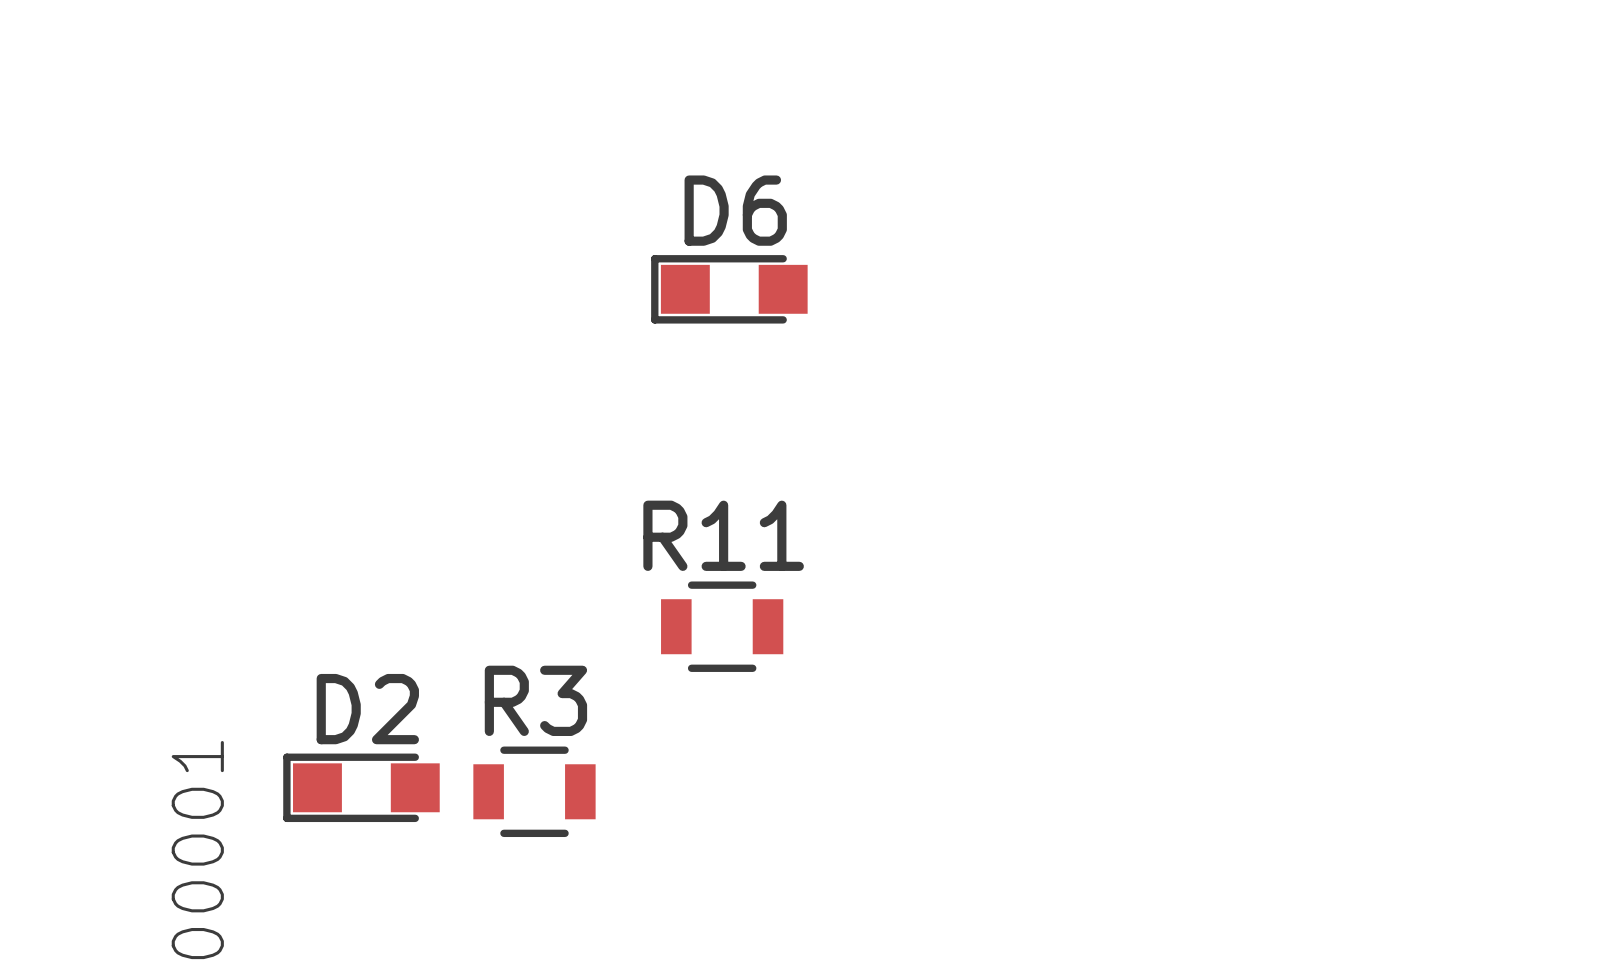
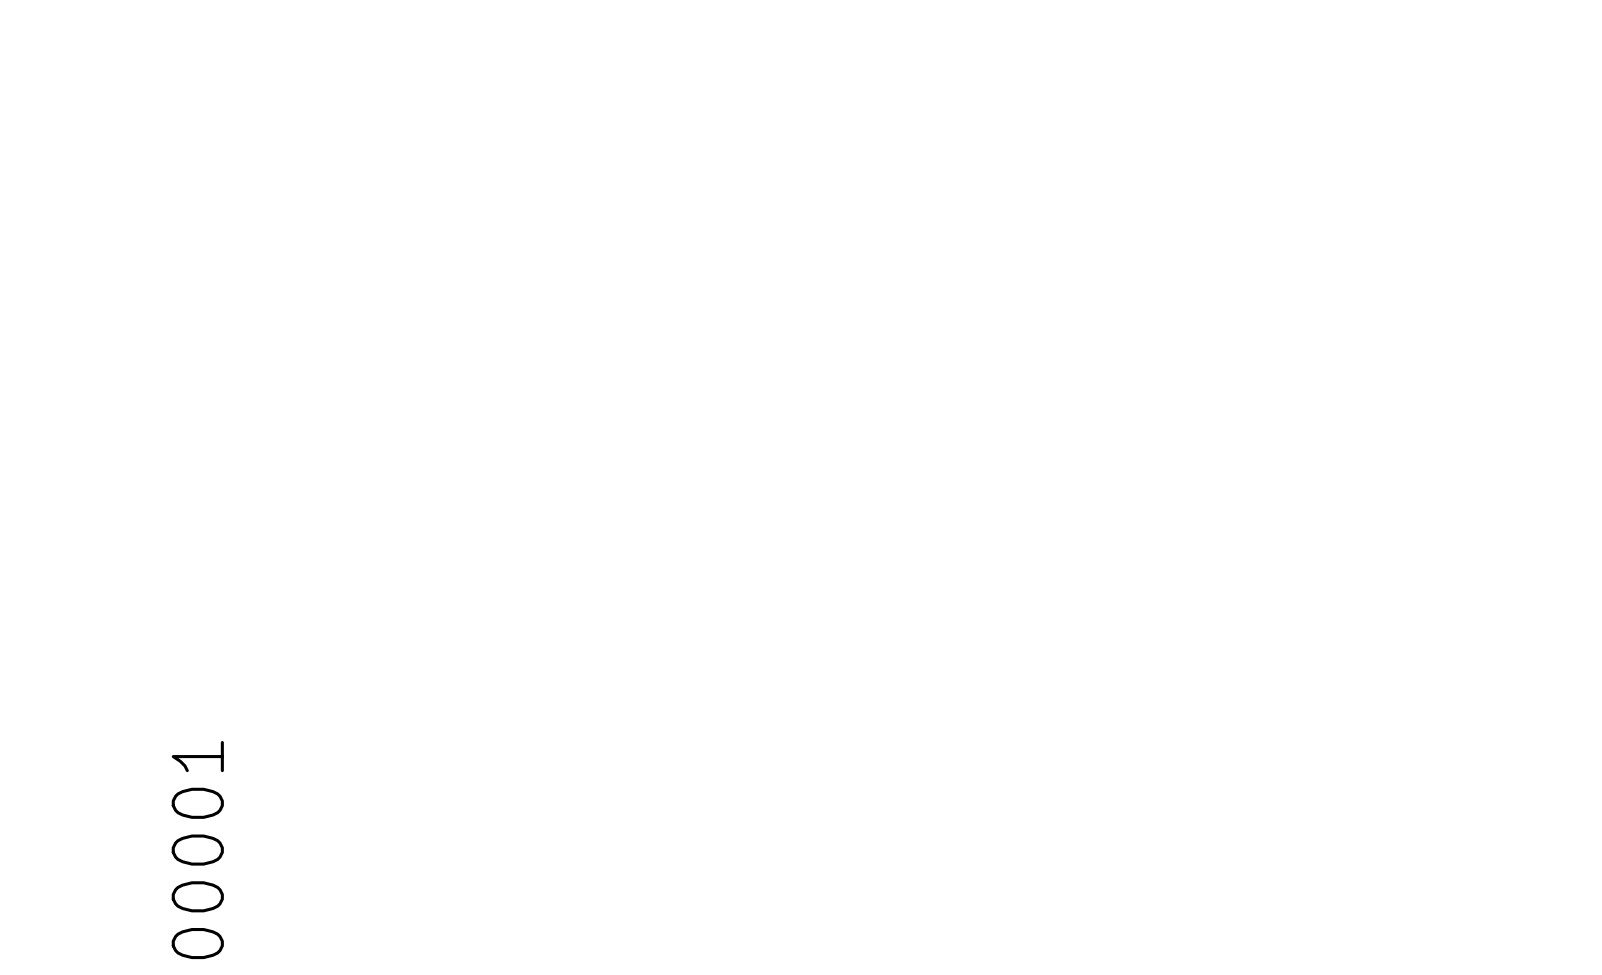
D6: (729, 289) -> none
R11: (722, 626) -> none
D2: (361, 787) -> none
R3: (534, 791) -> none

